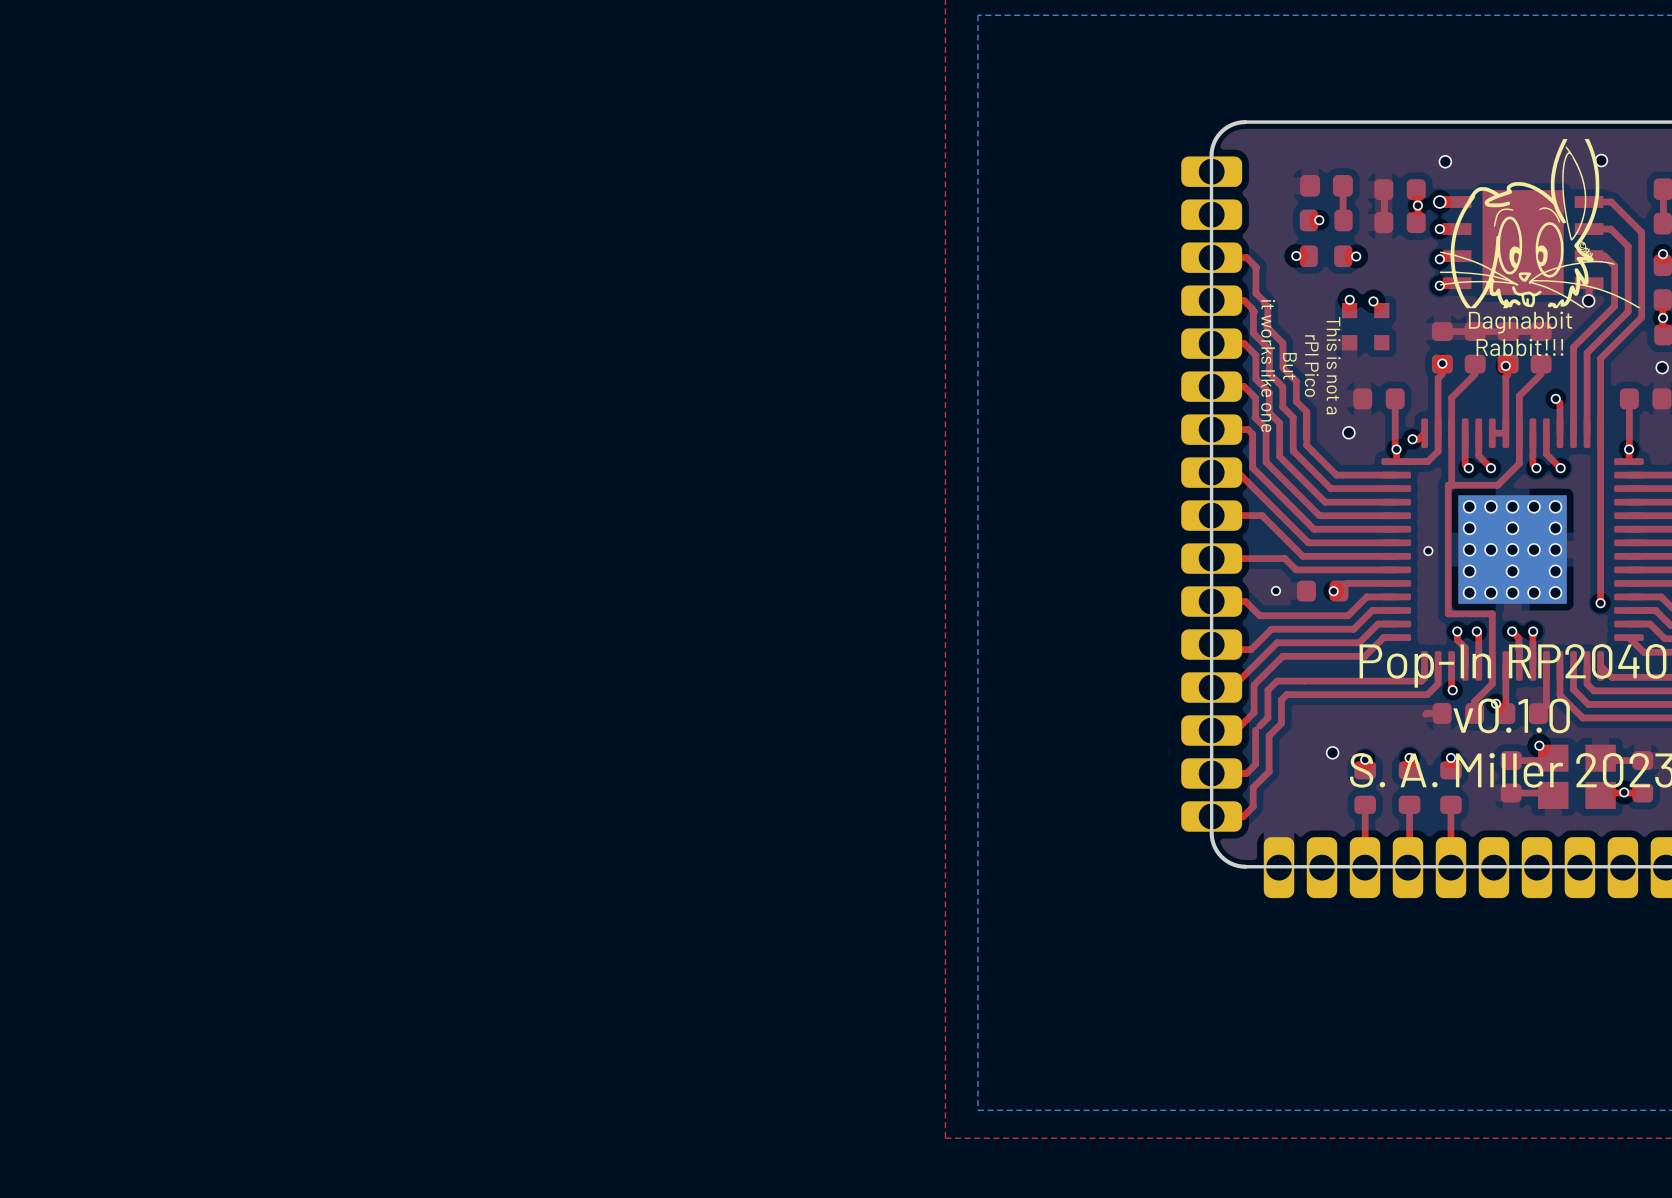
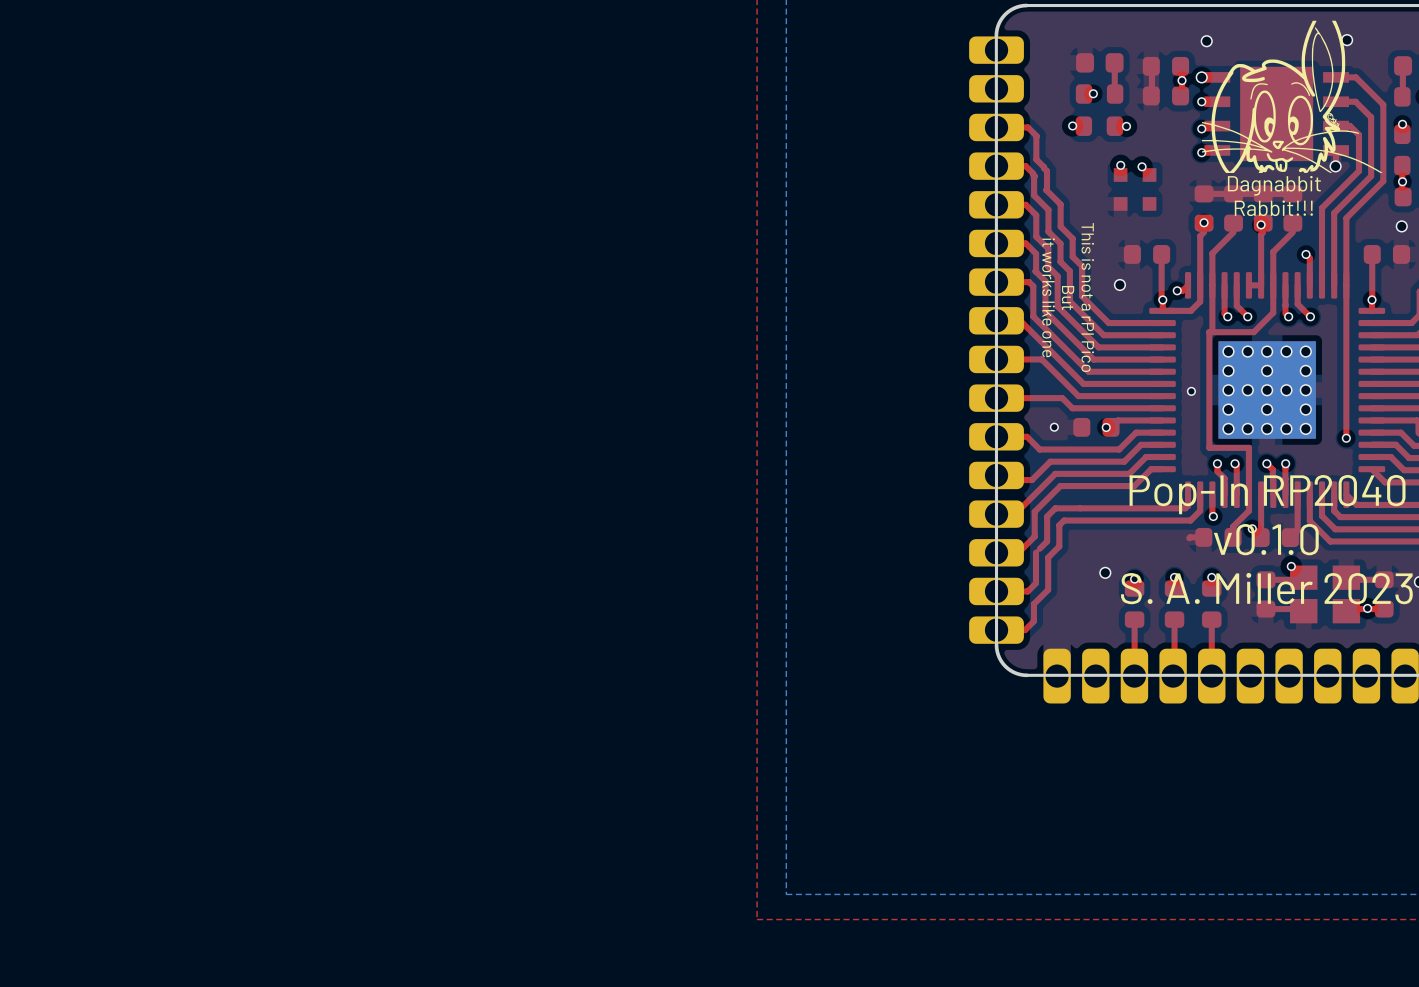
text: This is not a (1333, 365) -> This is not a rPI Pico (1087, 297)
text position: it works like one (1268, 366) -> it works like one (1048, 297)
text position: But (1289, 366) -> But (1068, 298)
text: rPI Pico (1311, 366) -> none

